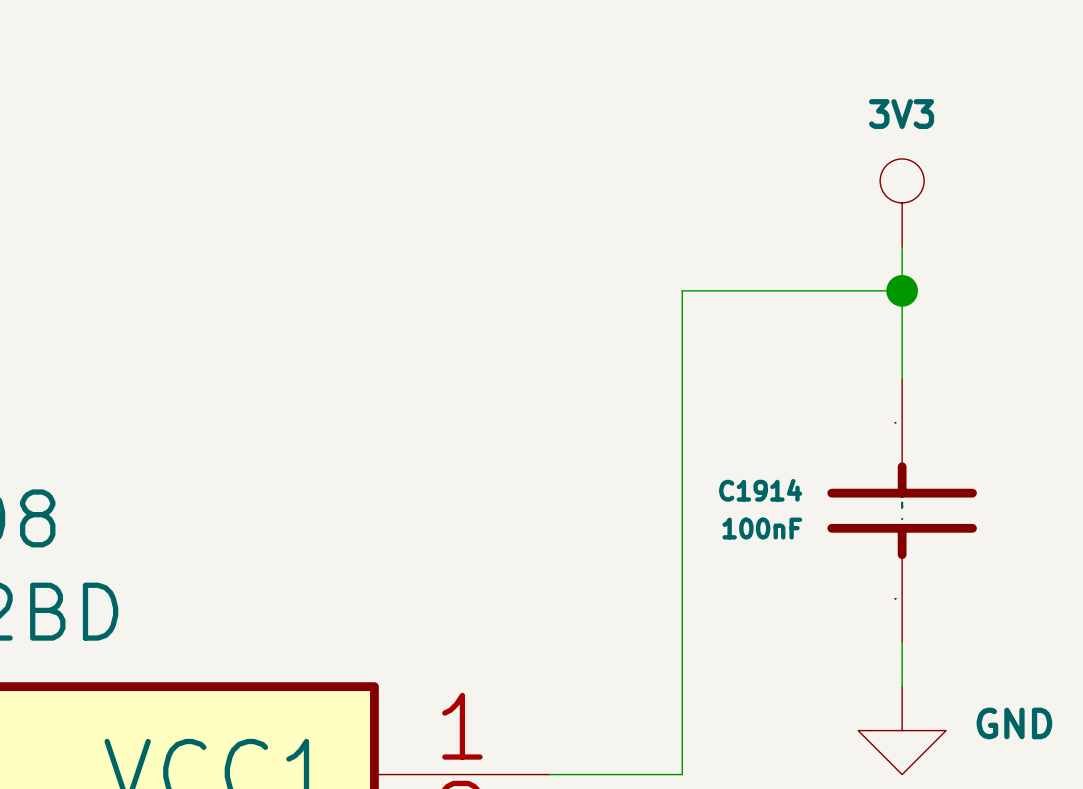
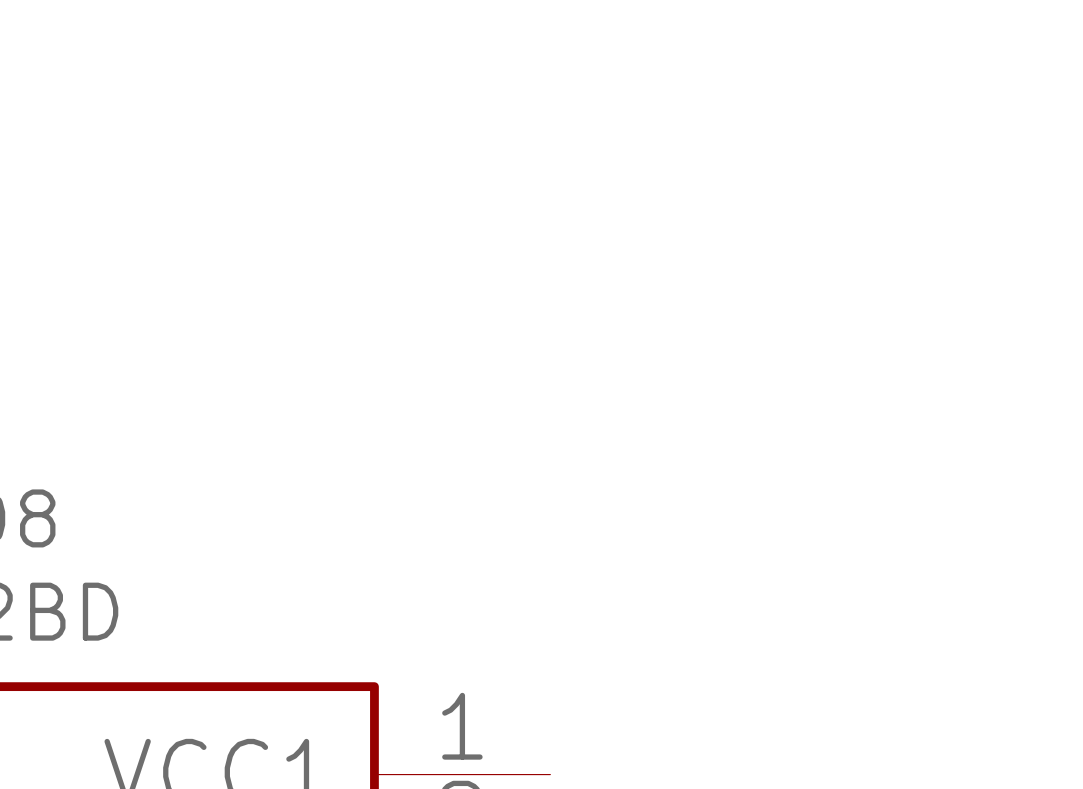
power symbol: 3V3 (902, 202) -> none
wire: (902, 246) (902, 378) -> none
wire: (902, 290) (682, 290) (682, 774) (550, 774) -> none
junction: (902, 290) -> none
C1914: 100nF (902, 510) -> none
wire: (902, 642) (902, 686) -> none
power symbol: GND (902, 730) -> none

